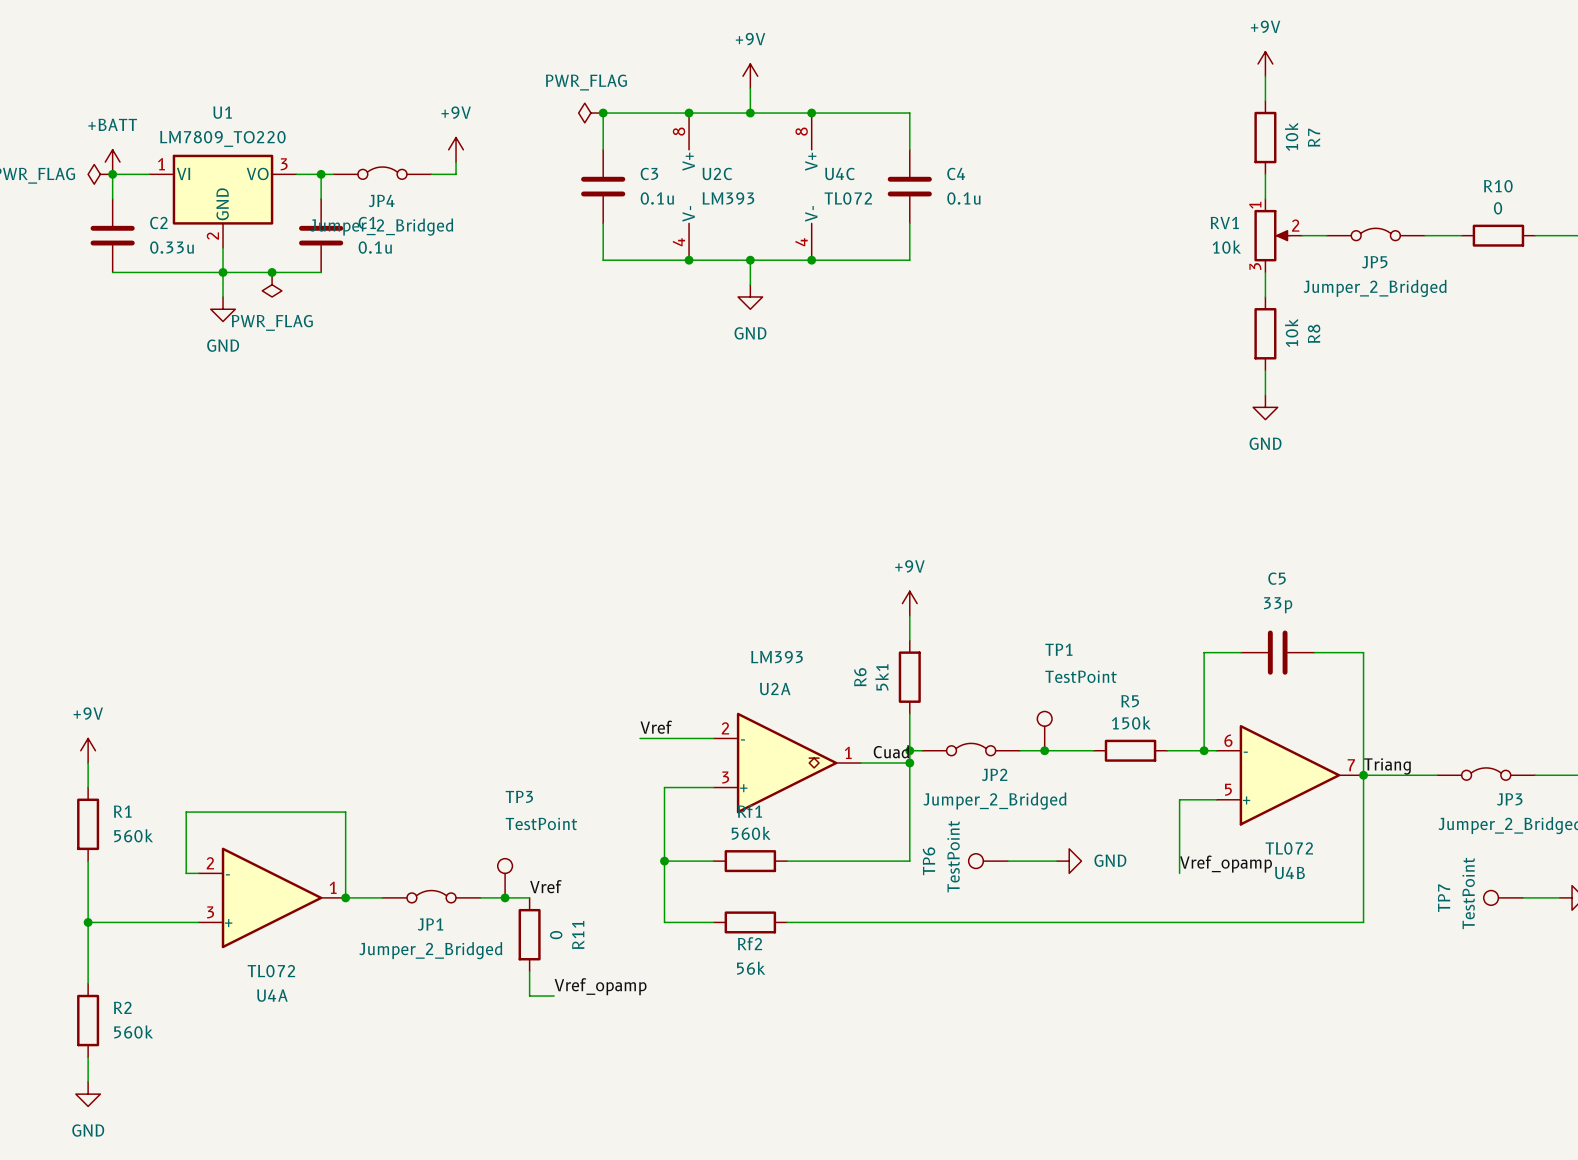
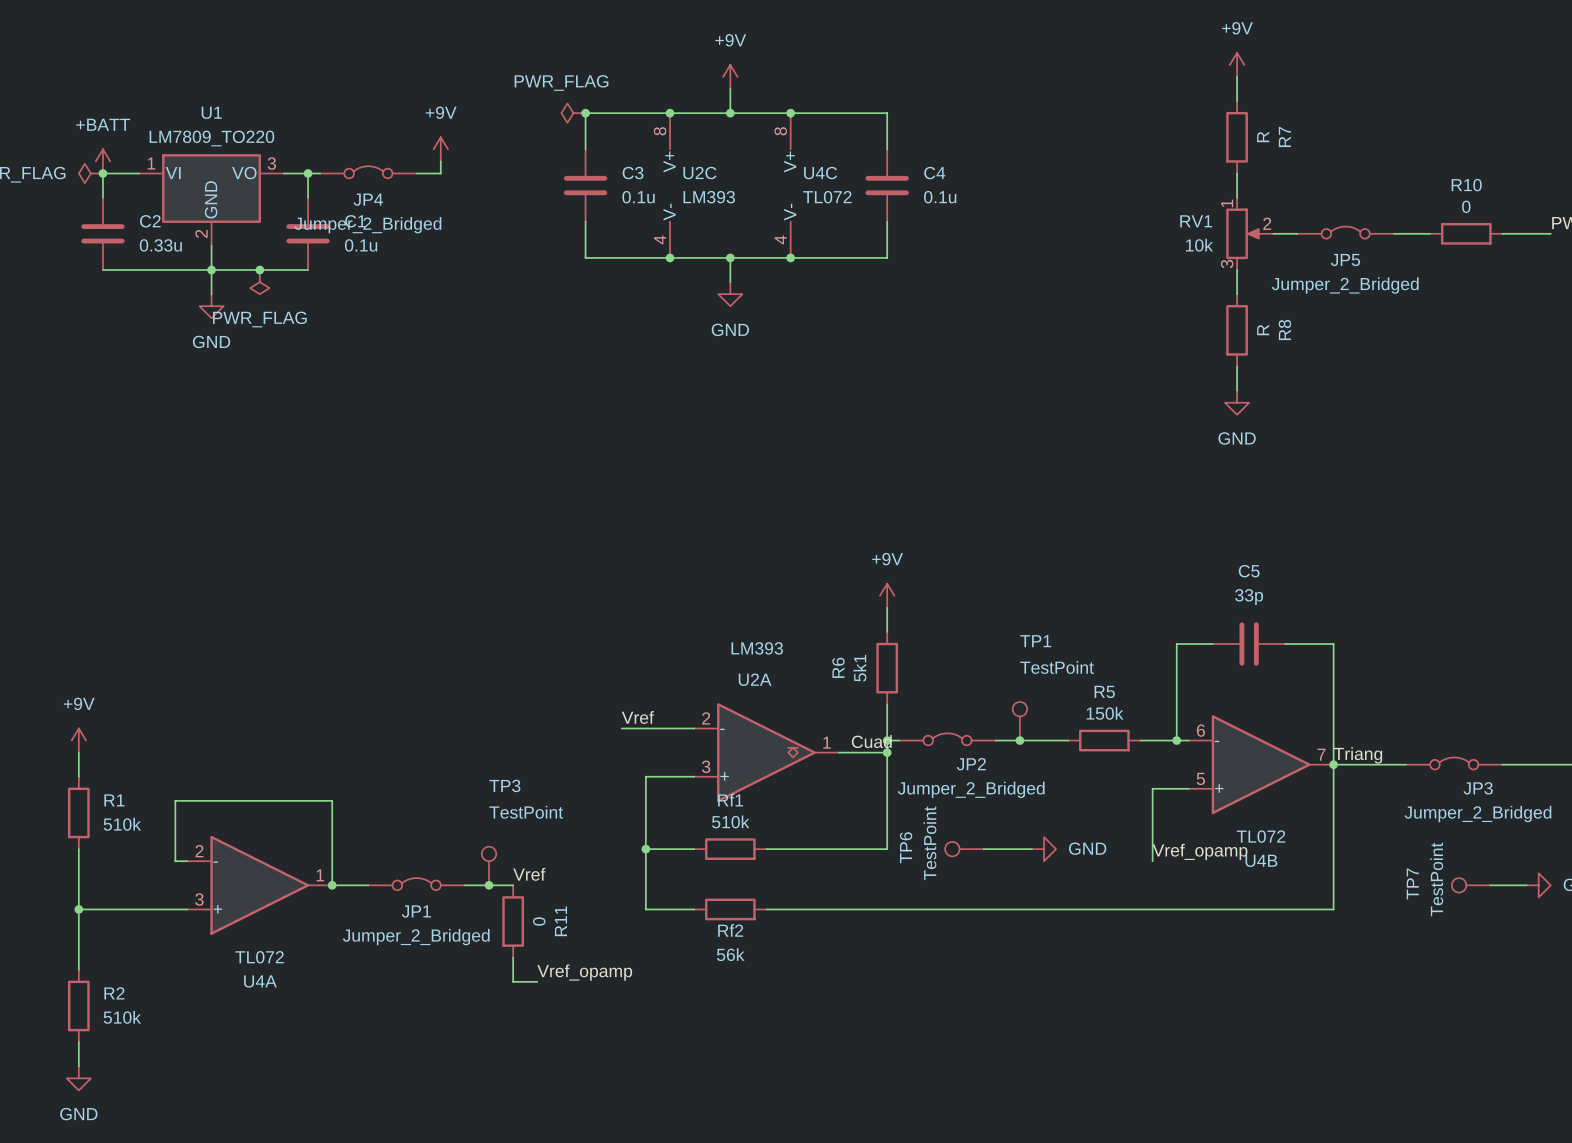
R7 value: 10k (1291, 136) -> R (1263, 136)
R8 value: 10k (1291, 332) -> R (1263, 330)
Rf1 value: 560k (751, 833) -> 510k (730, 821)
R1 value: 560k (133, 835) -> 510k (122, 824)
R2 value: 560k (133, 1032) -> 510k (122, 1017)

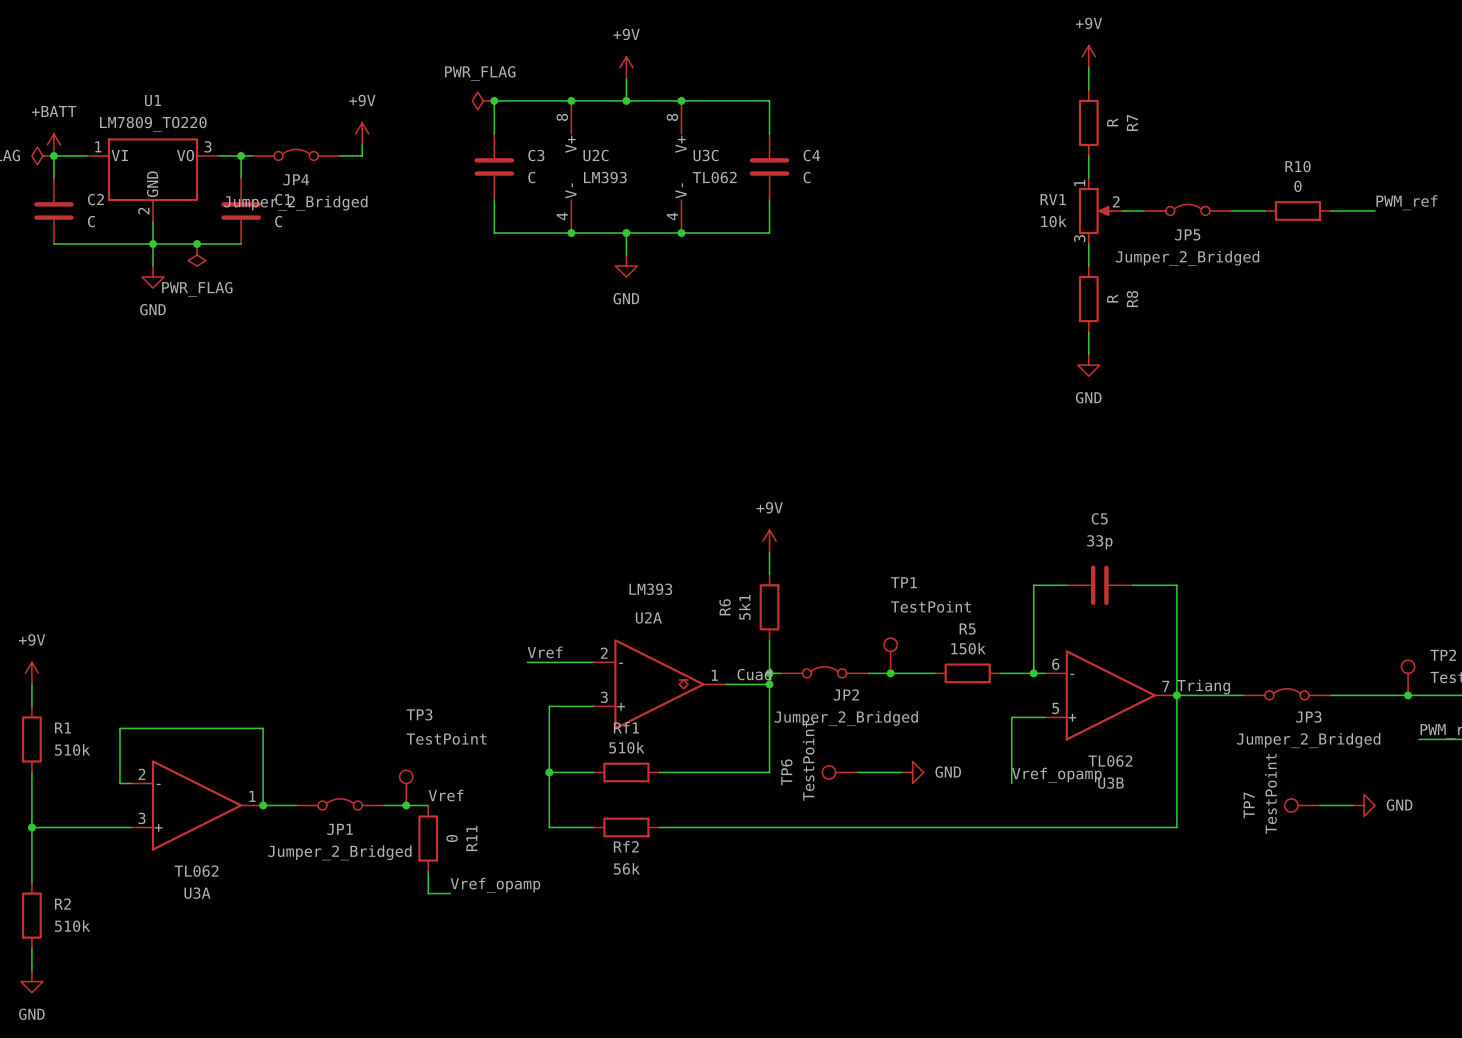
U4C name: U4C (820, 173) -> U3C (706, 155)
C3 value: 0.1u (638, 197) -> C (531, 177)
U4C value: TL072 (827, 197) -> TL062 (714, 177)
C4 value: 0.1u (940, 197) -> C (807, 177)
C2 value: 0.33u (160, 245) -> C (91, 221)
C1 value: 0.1u (361, 245) -> C (278, 221)
U4B value: TL072 (1260, 836) -> TL062 (1110, 761)
U4B name: U4B (1261, 860) -> U3B (1111, 783)
U4A value: TL072 (259, 957) -> TL062 (196, 871)
U4A name: U4A (260, 981) -> U3A (197, 893)

